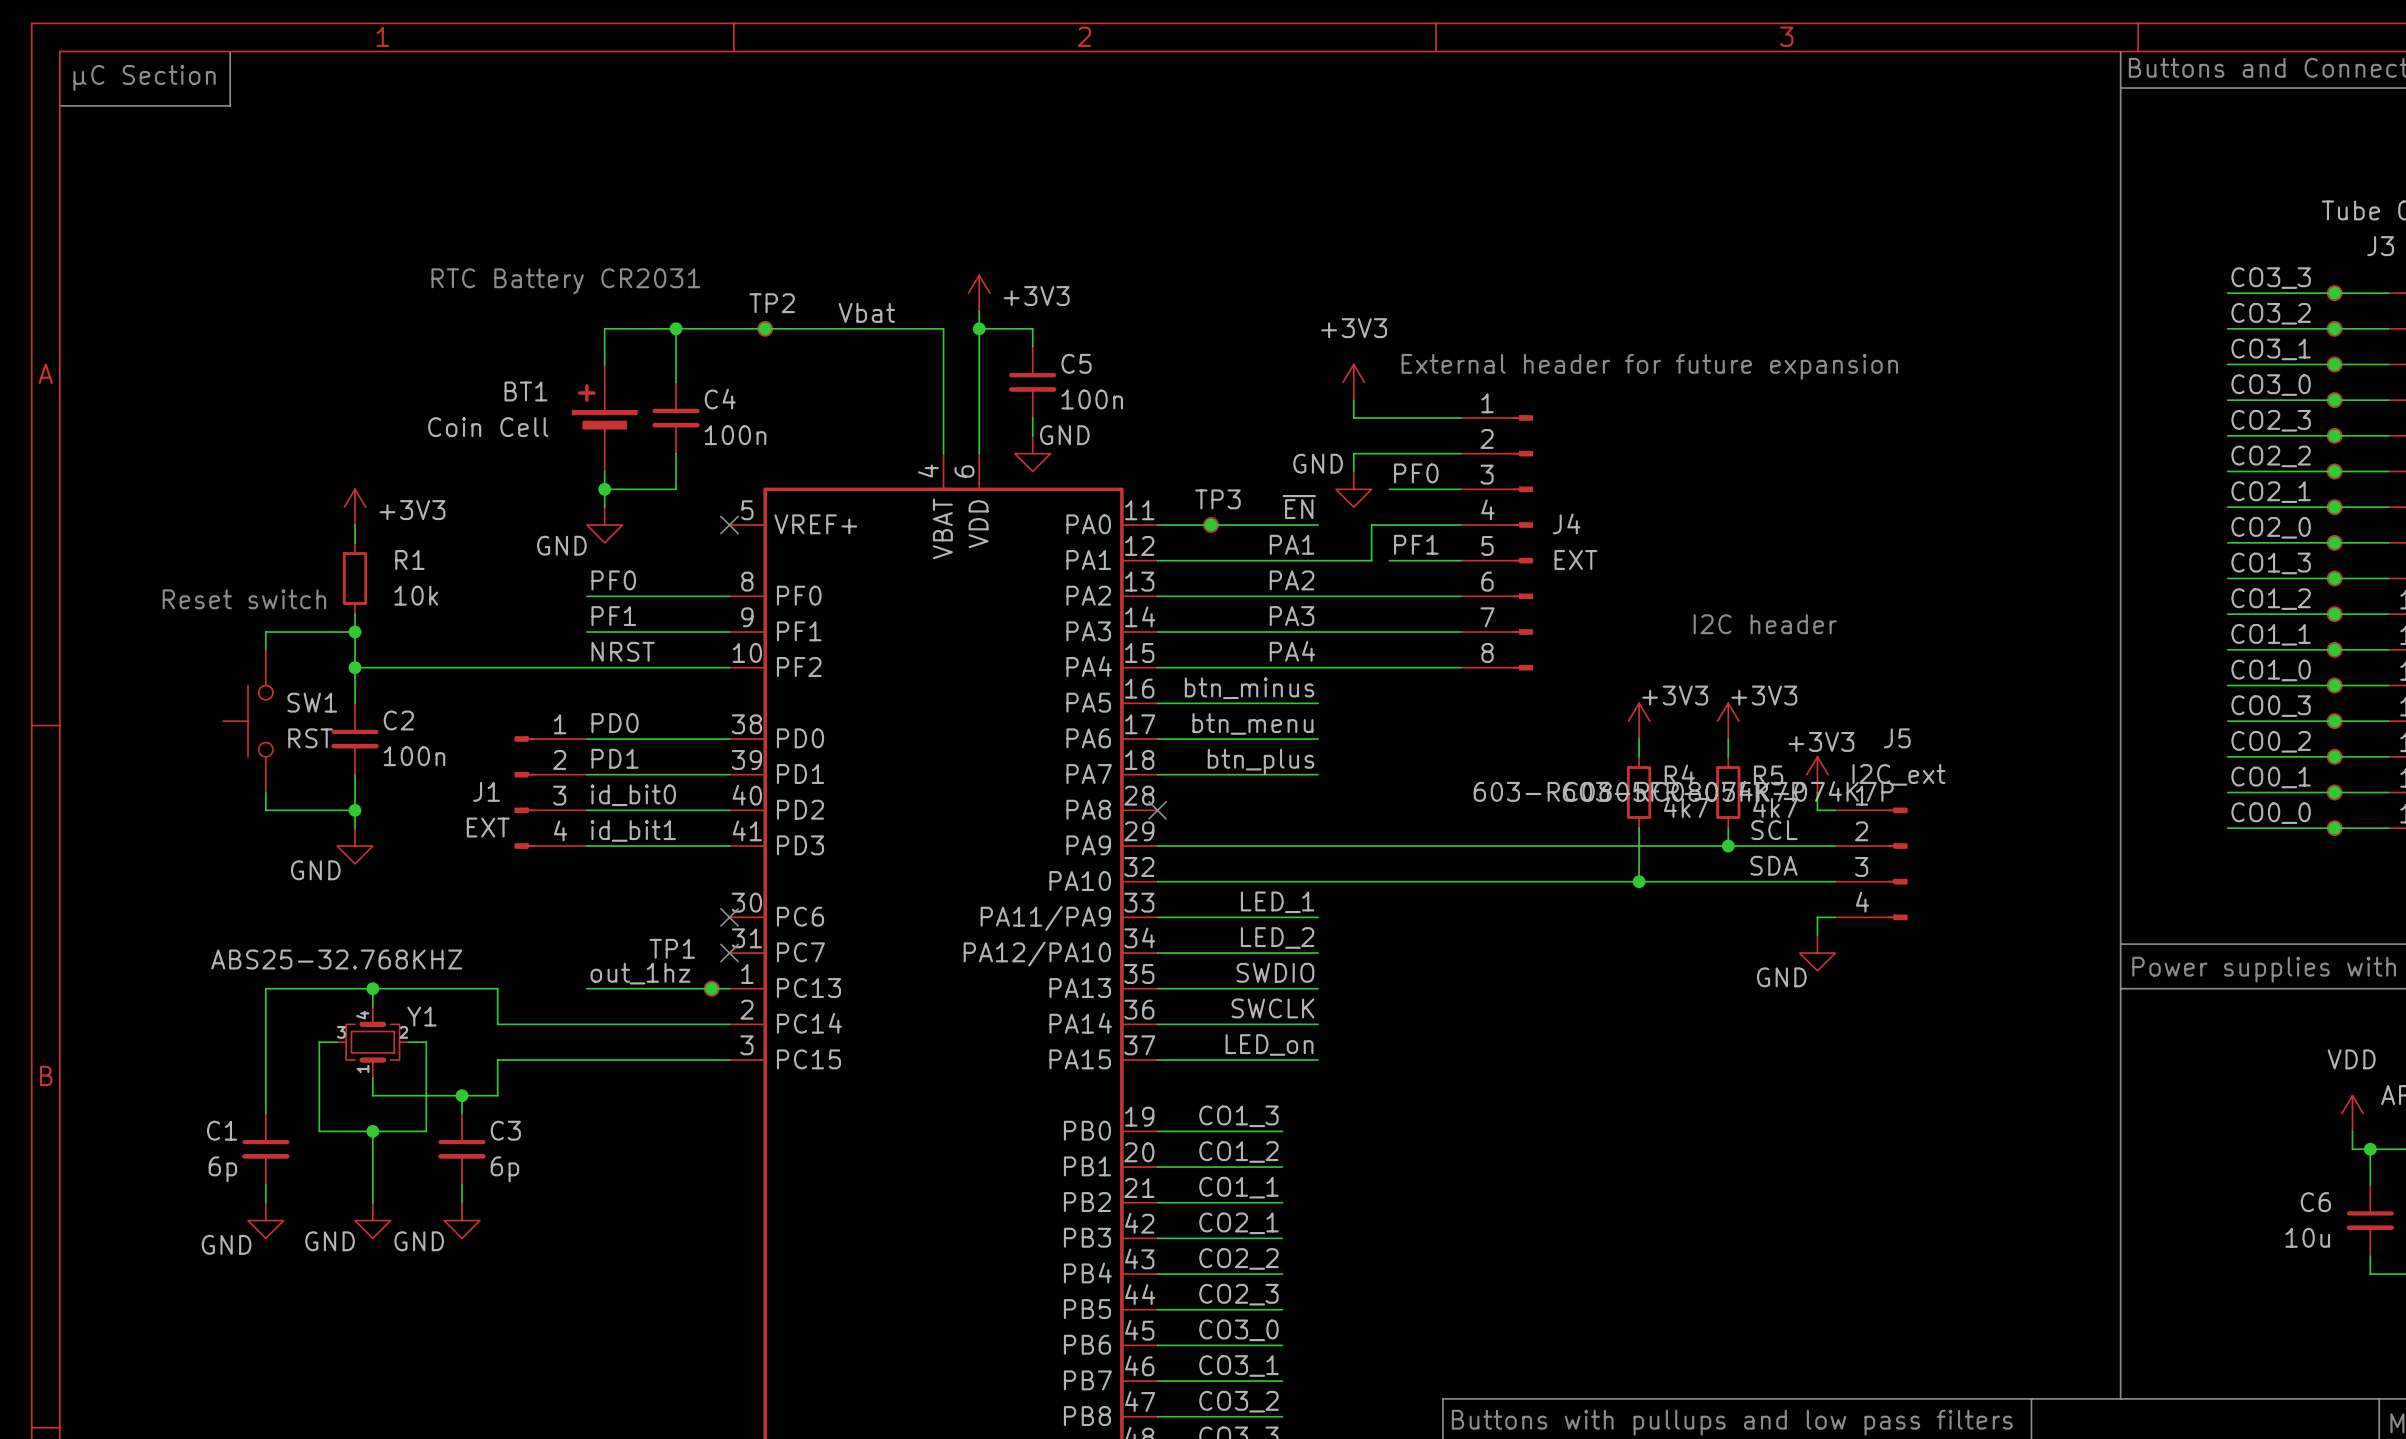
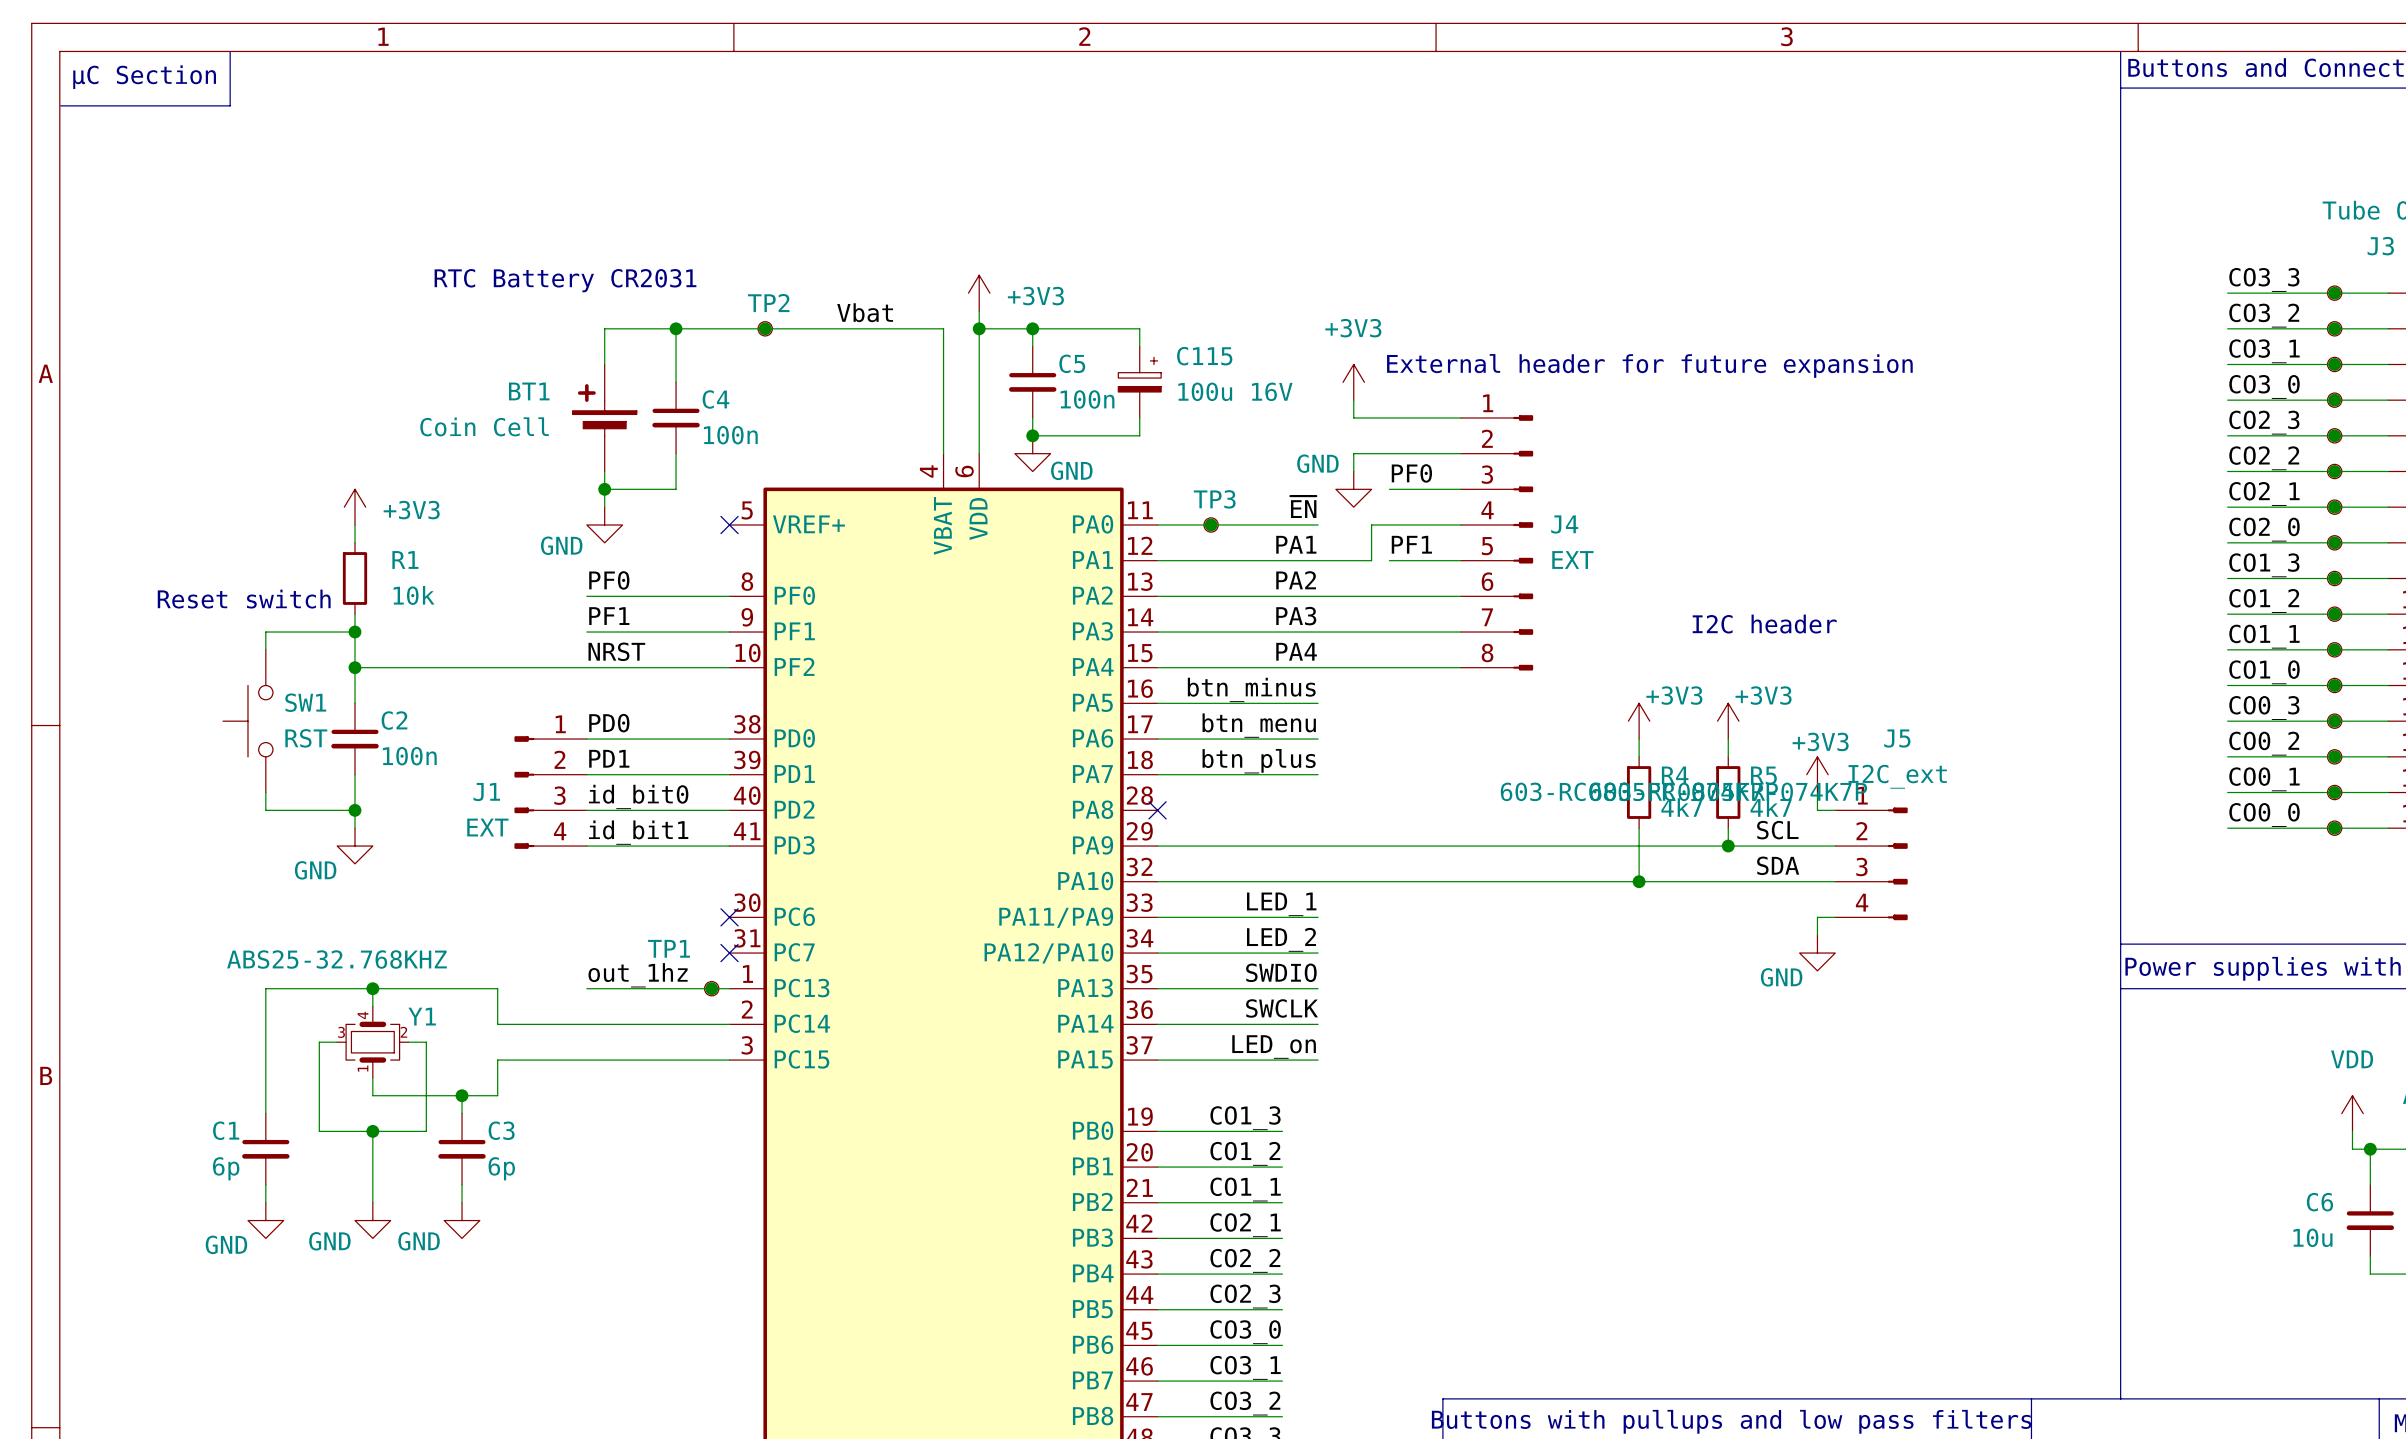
wire: none -> (1032, 328) (1139, 328) (1139, 346)
junction: none -> (1032, 328)
C115: none -> 100u 16V (1139, 382)
wire: none -> (1139, 417) (1139, 435) (1032, 435)
junction: none -> (1032, 435)
power symbol text position: GND (1064, 435) -> GND (1071, 470)

